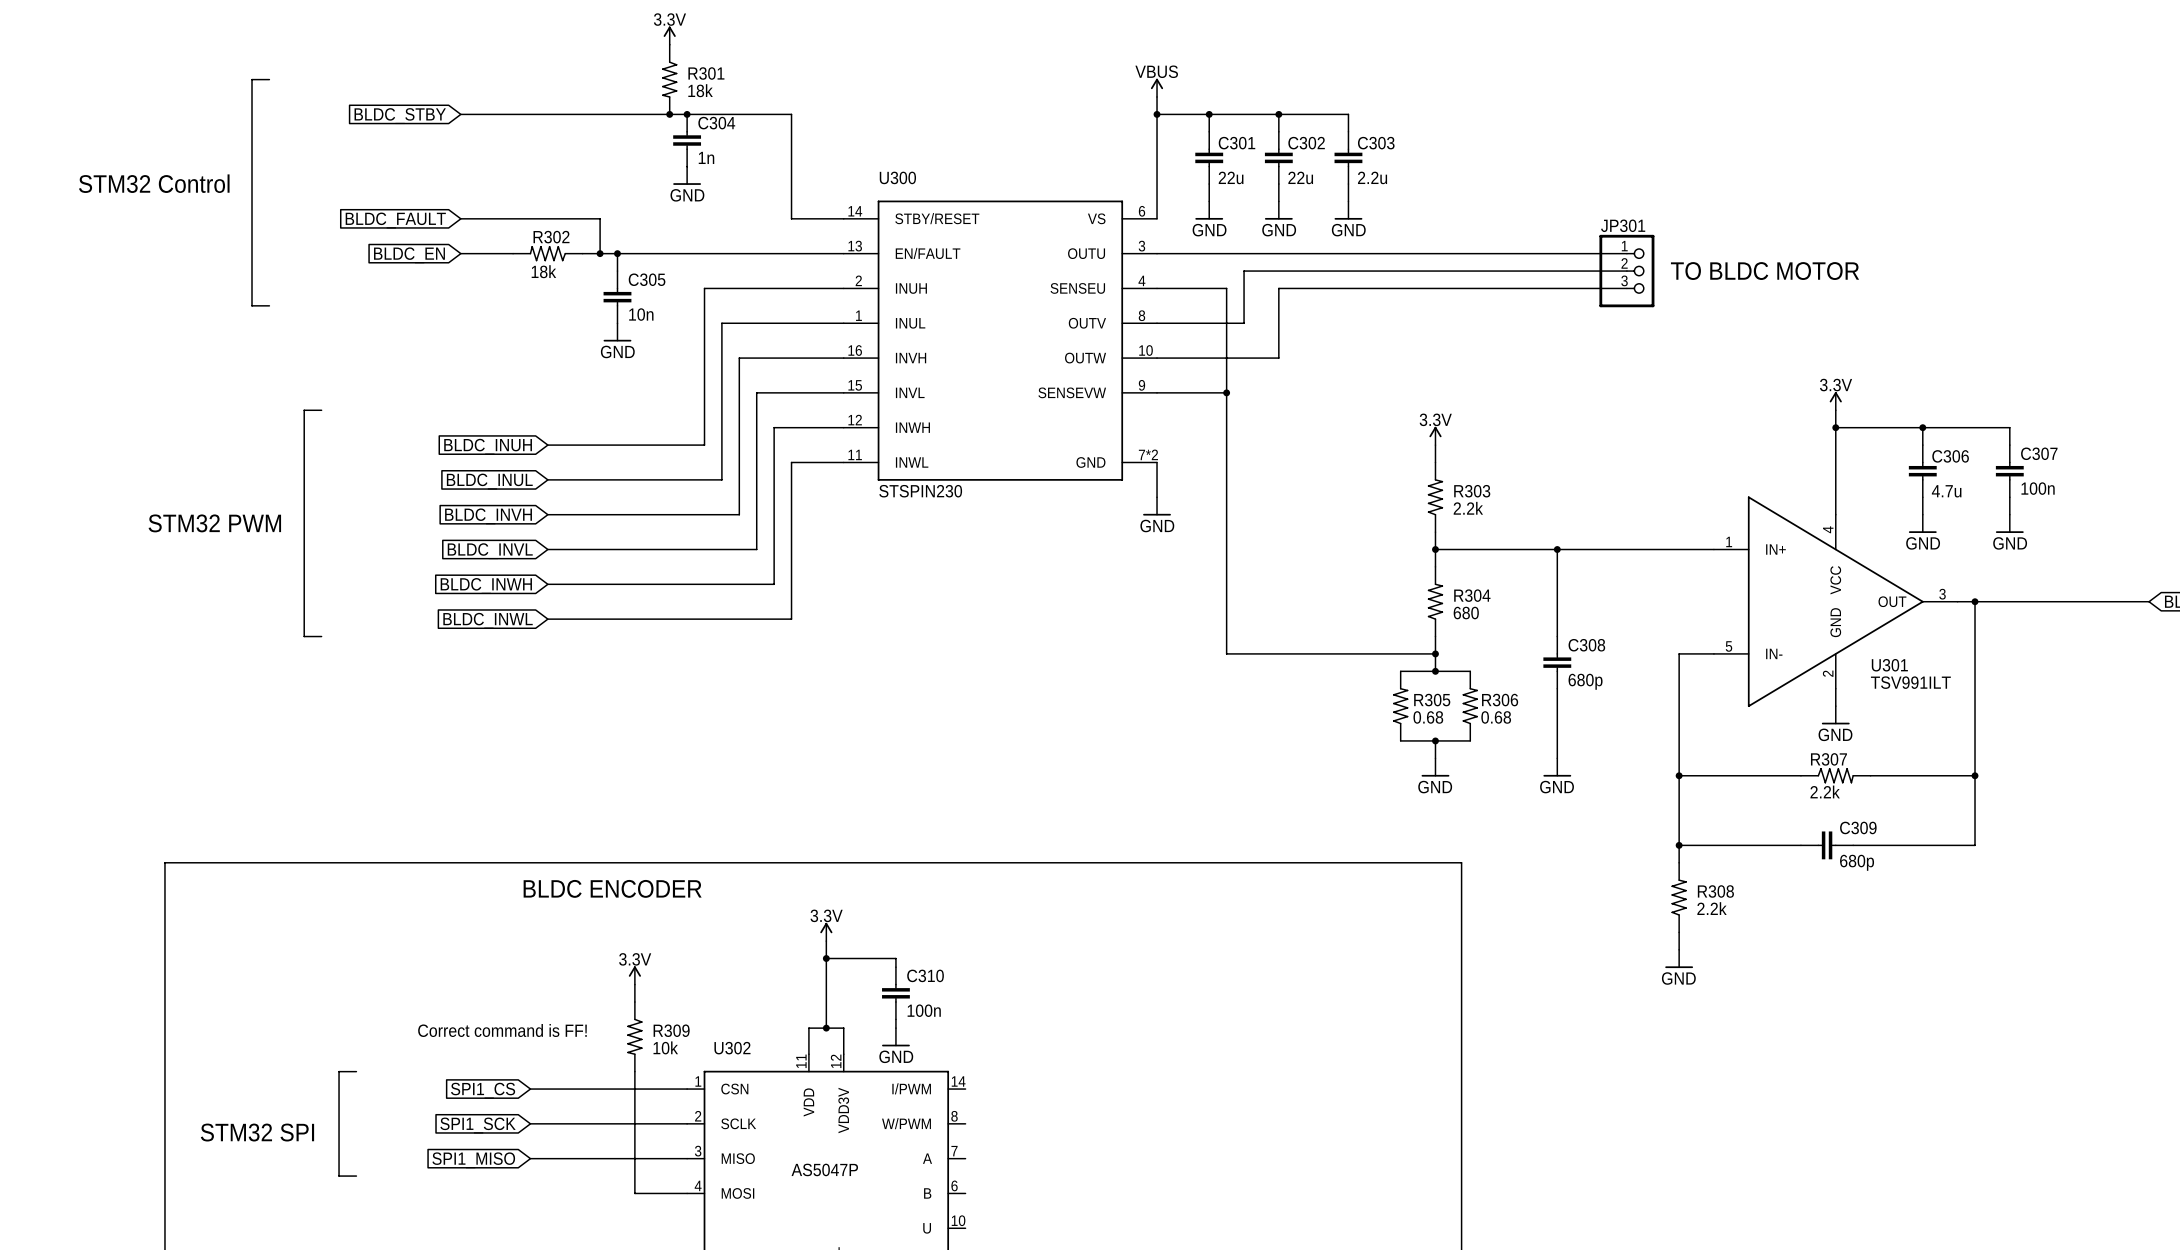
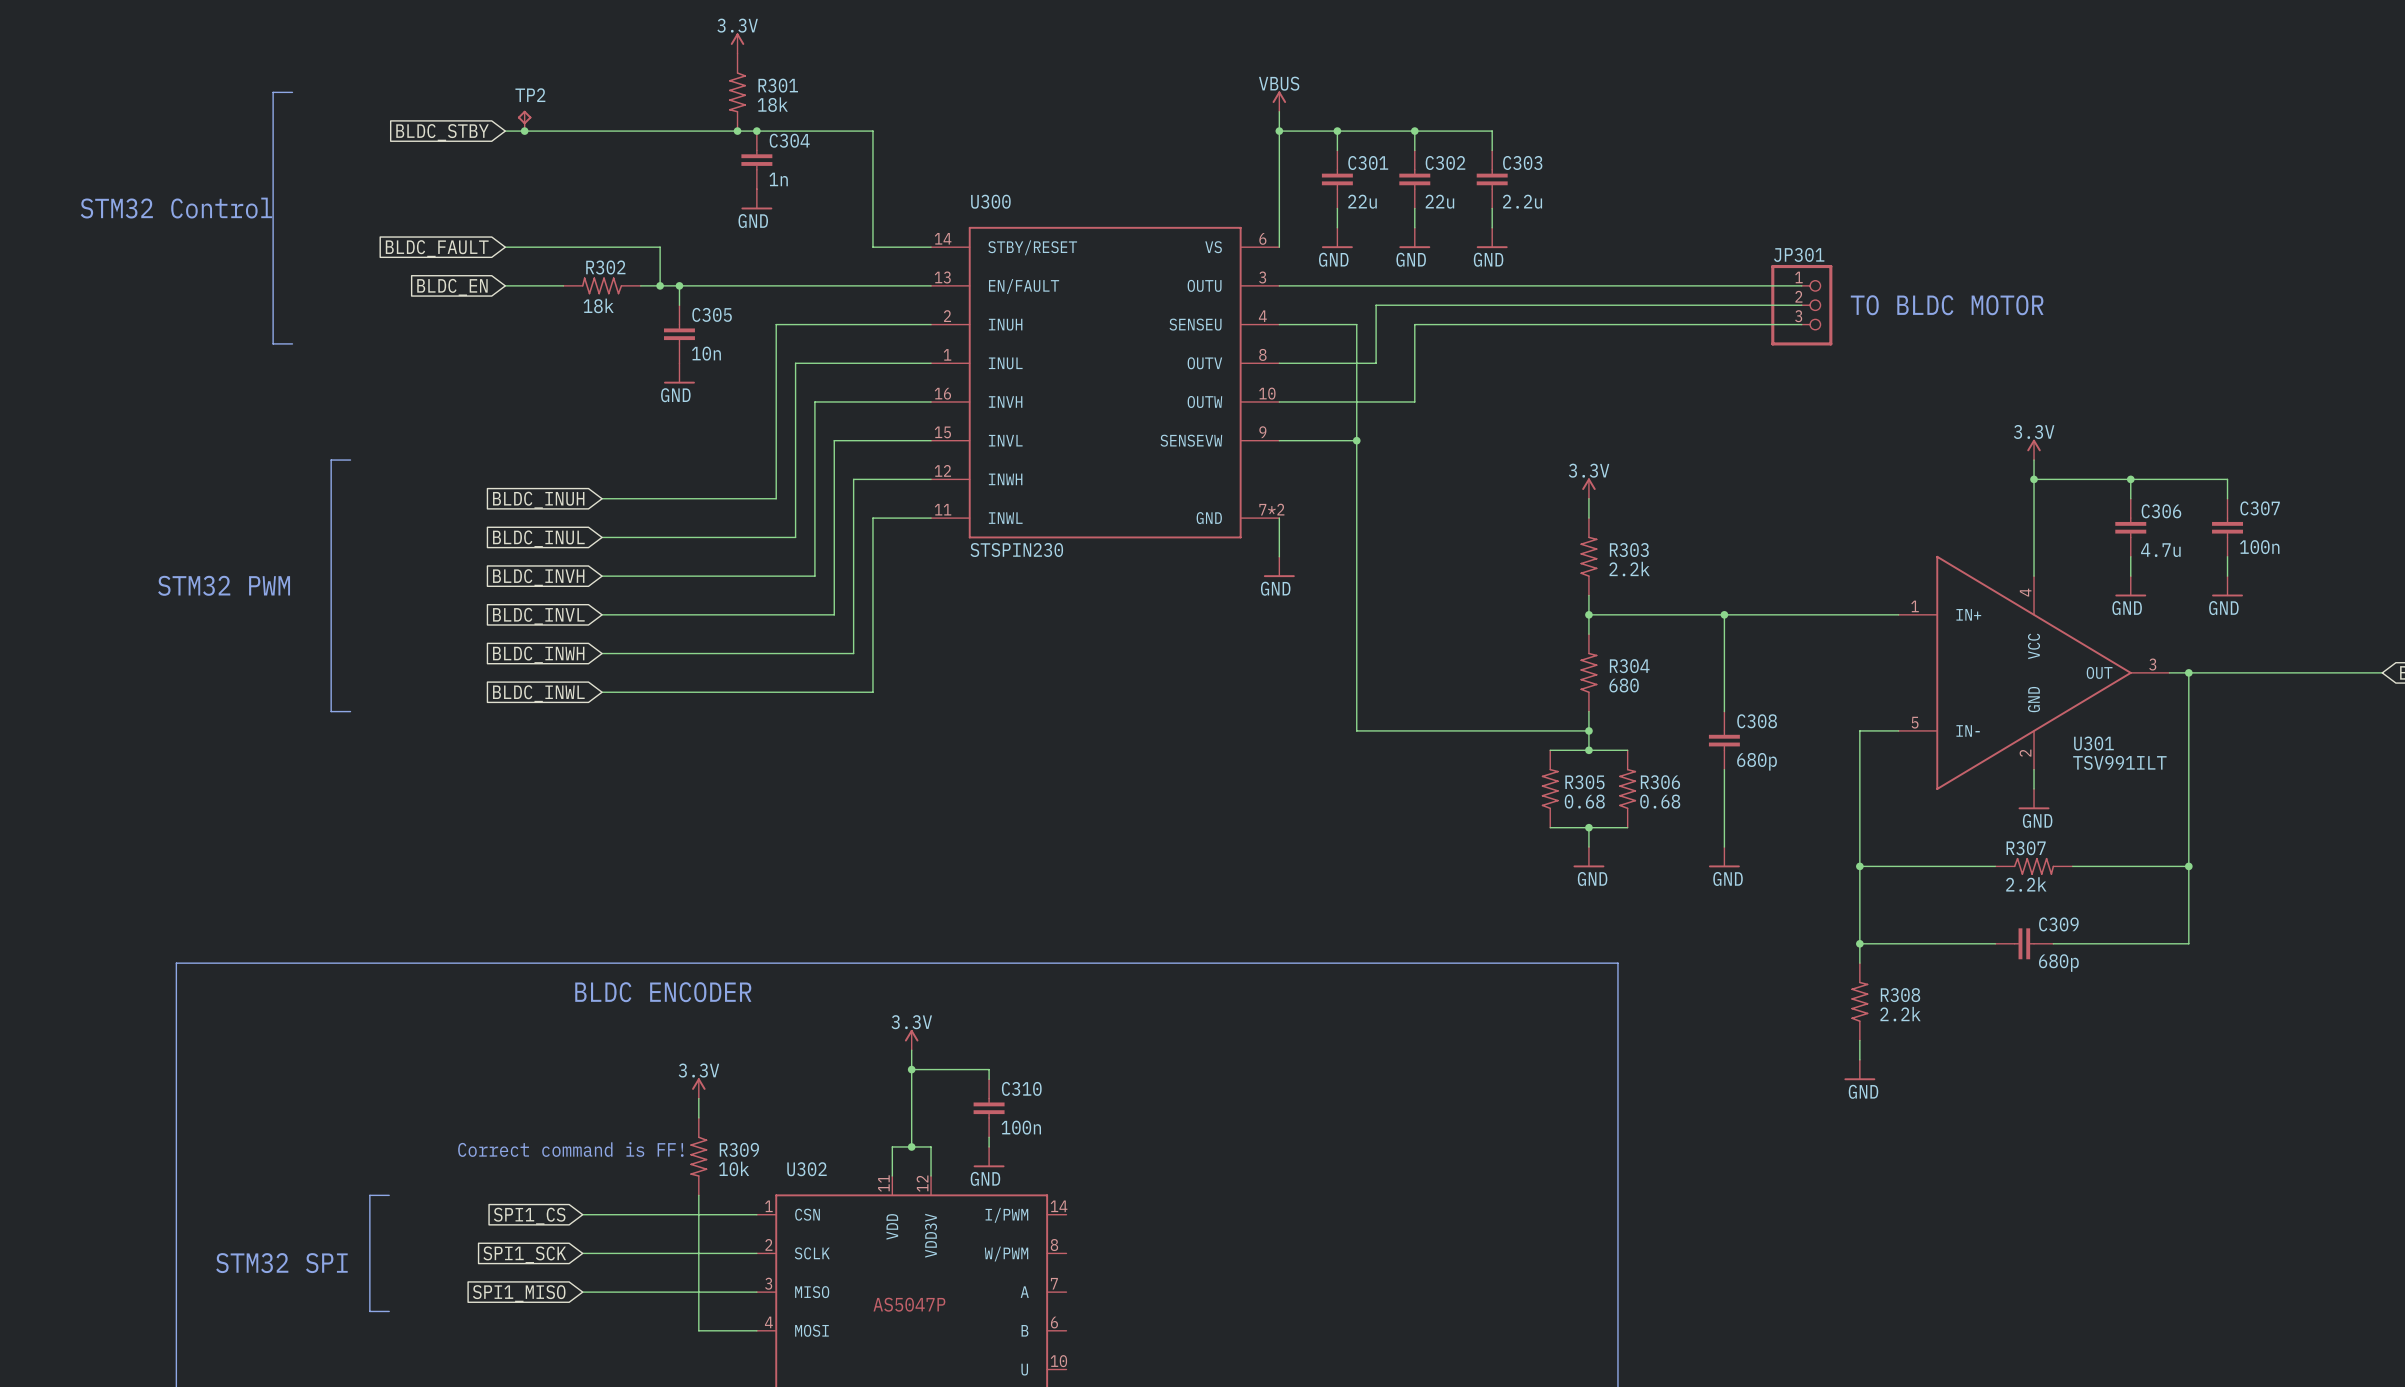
TP2: none -> (524, 120)
junction: none -> (524, 131)

